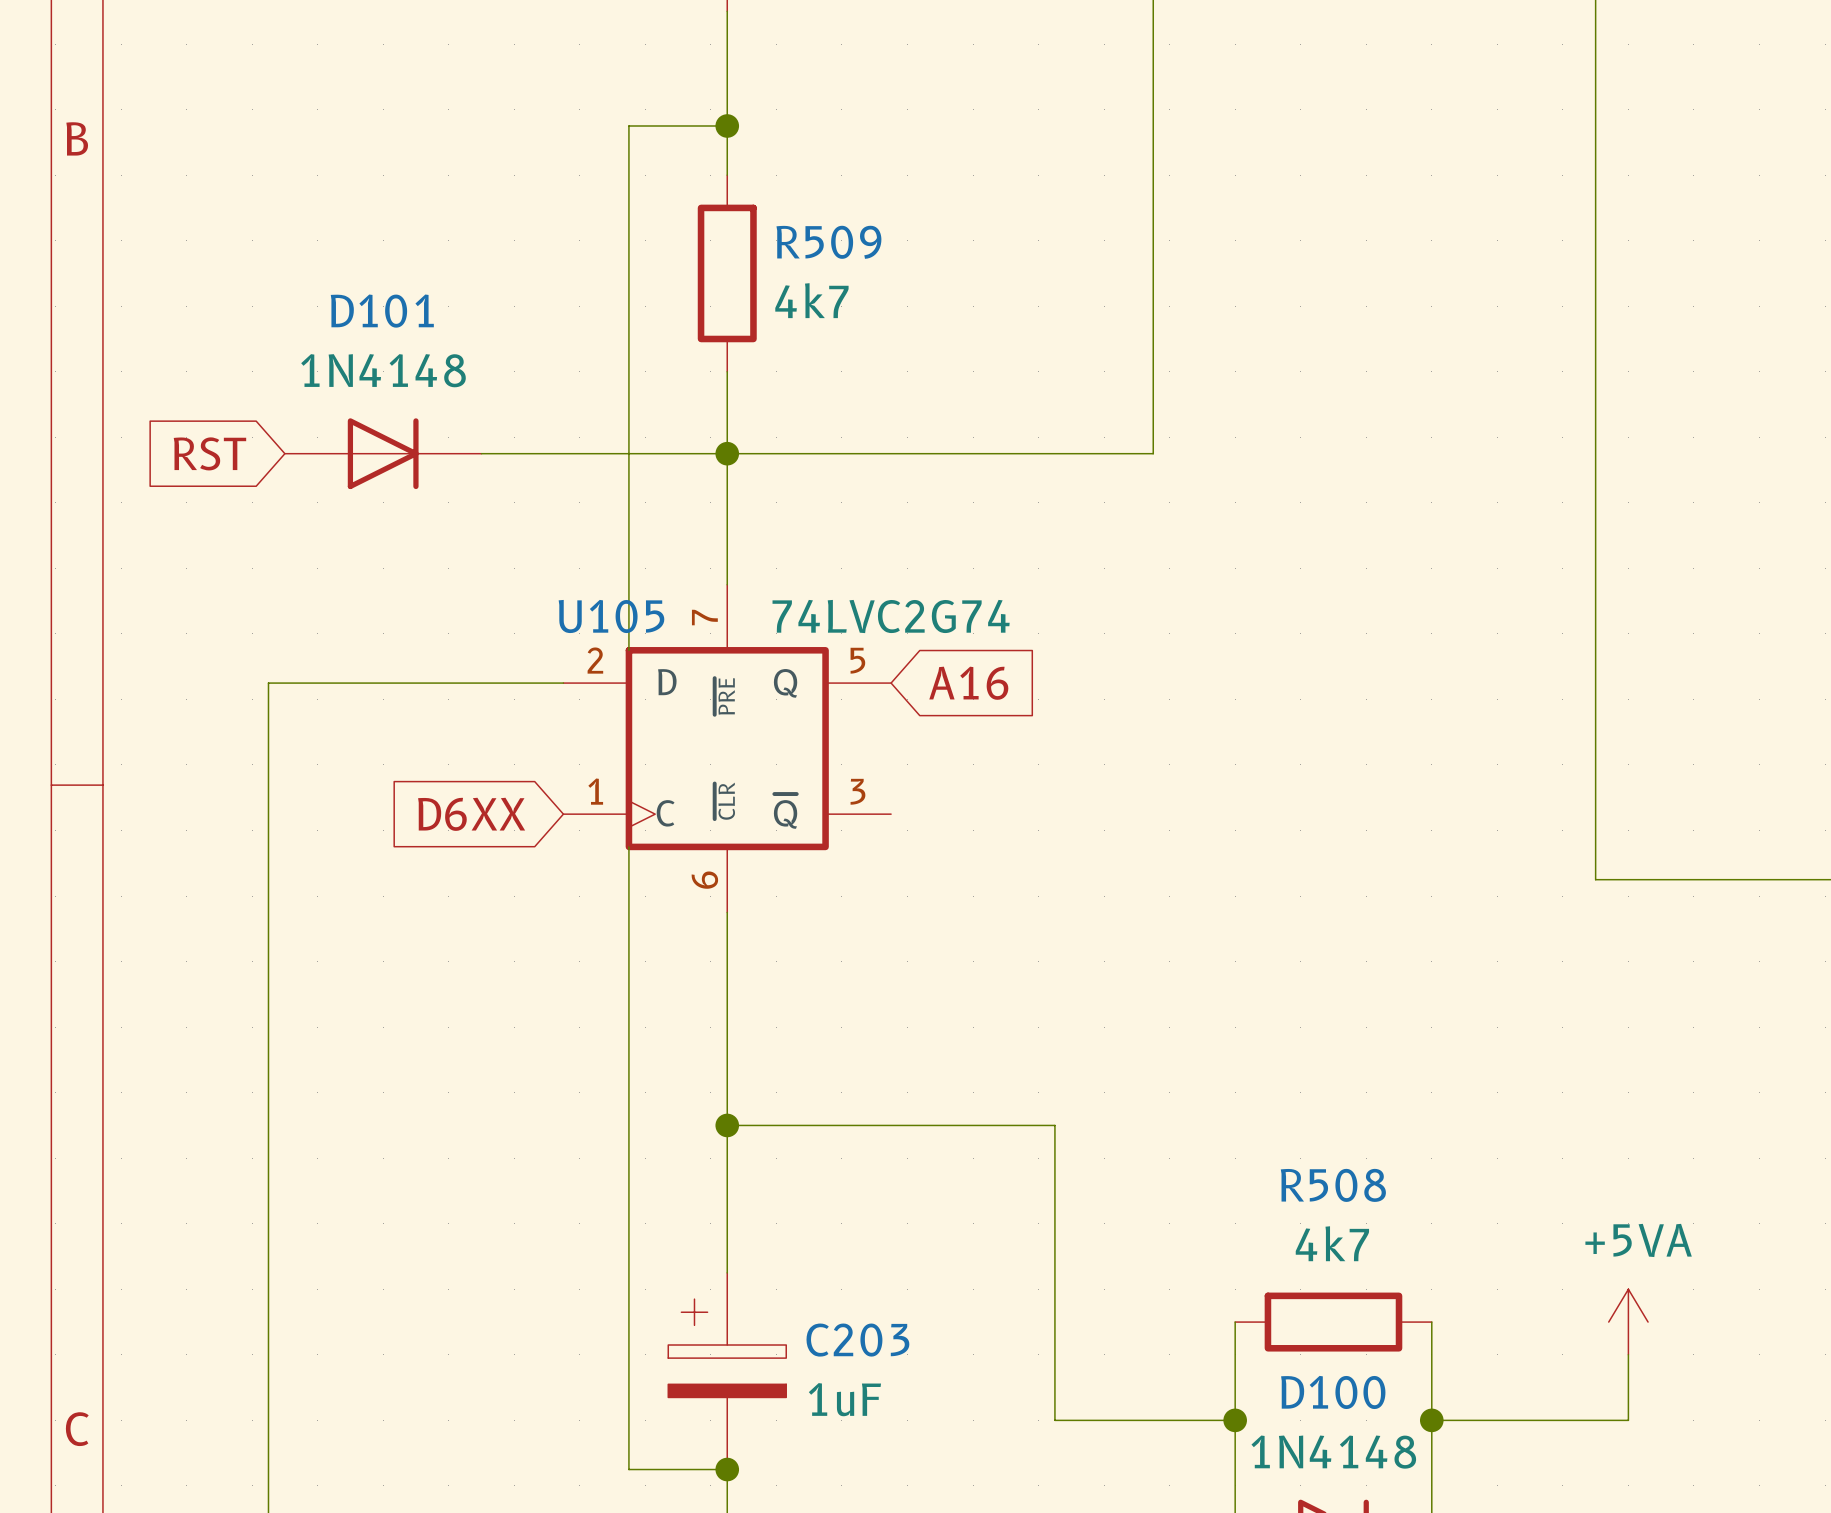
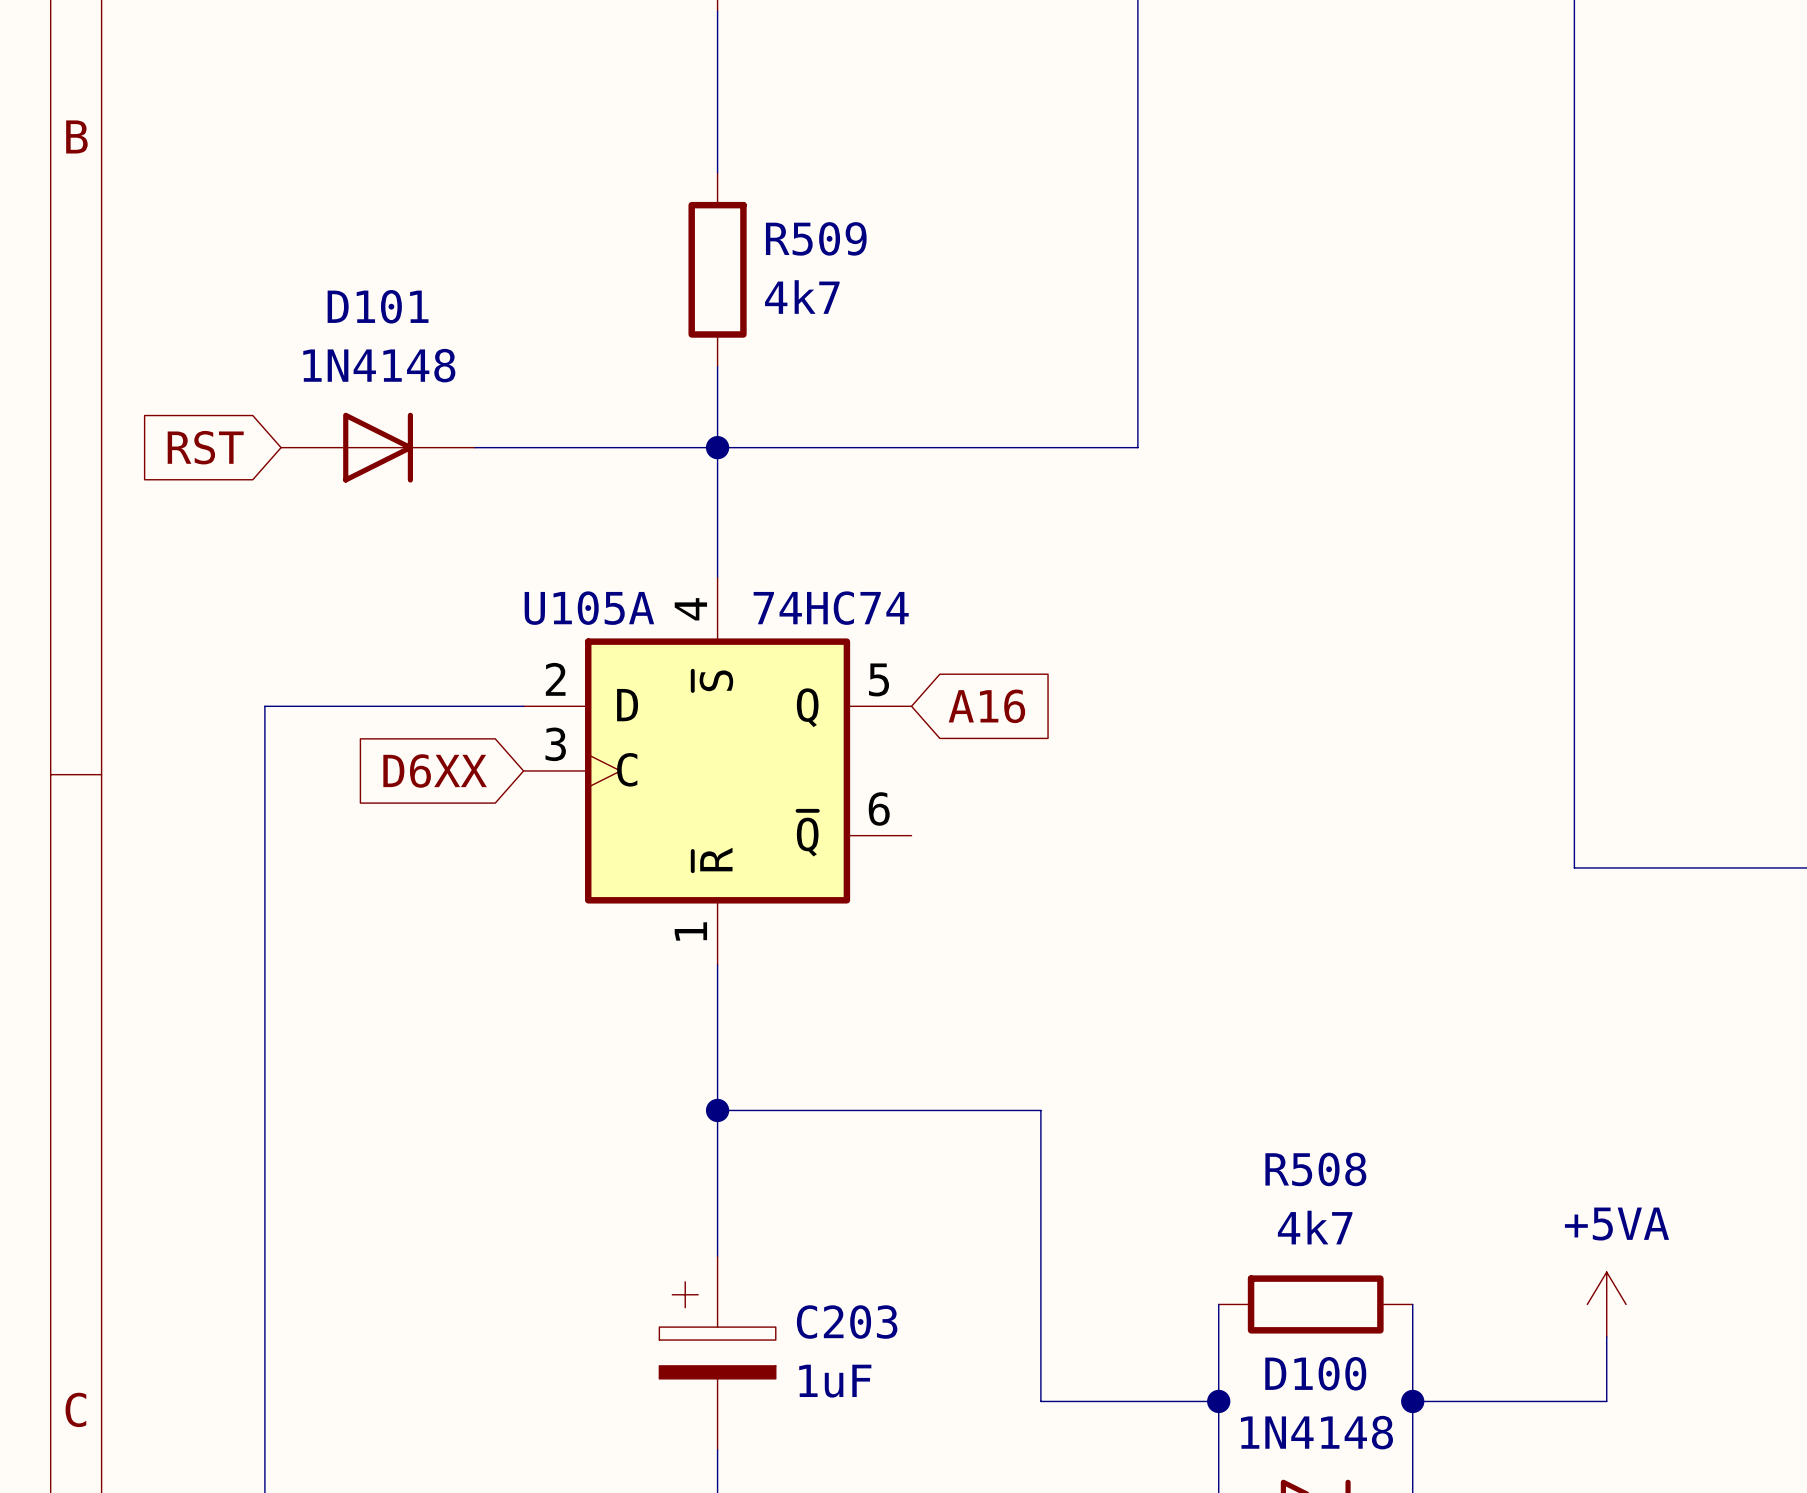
wire: (727, 125) (628, 125) (628, 650) -> none
junction: (727, 125) -> none
wire: (563, 683) (268, 683) (268, 715) -> (523, 706) (264, 706)
global label position: A16 (968, 683) -> A16 (986, 706)
U105: 74LVC2G74 (727, 748) -> none
U105A: none -> 74HC74 (717, 770)
global label position: D6XX (471, 814) -> D6XX (435, 771)
wire: (628, 846) (628, 1469) (727, 1469) -> none
junction: (727, 1469) -> none

